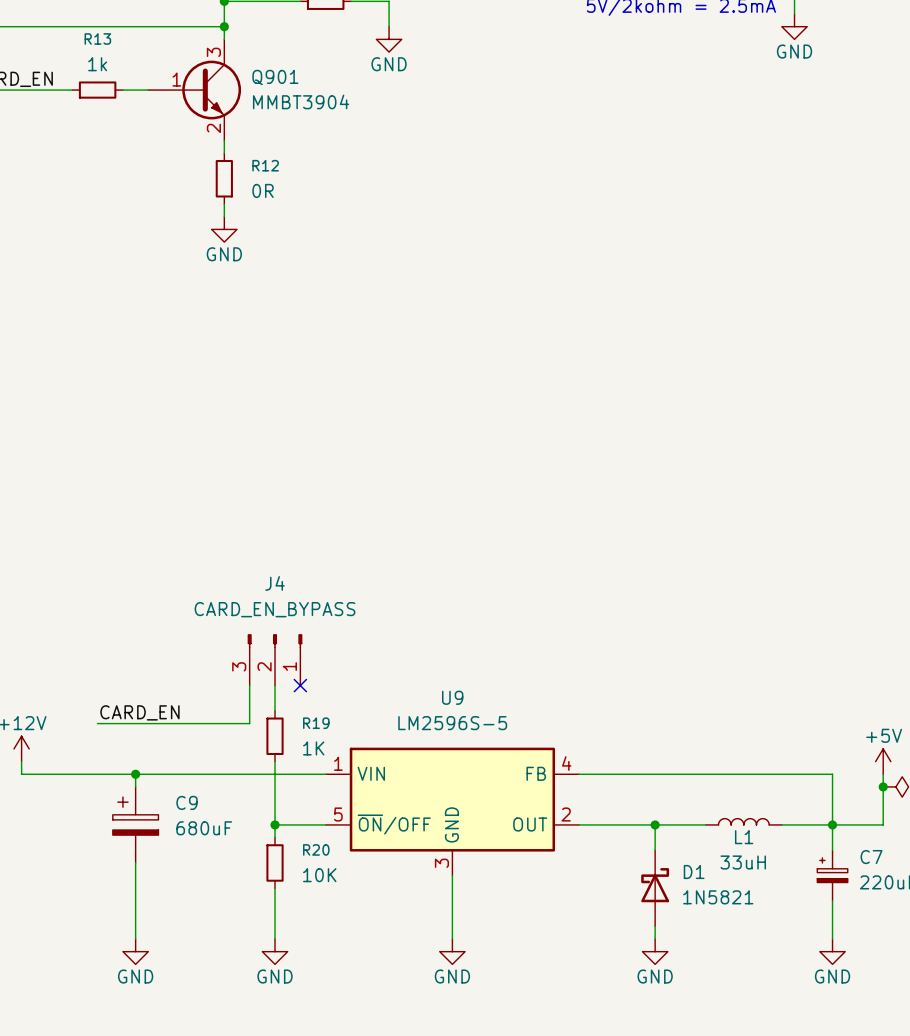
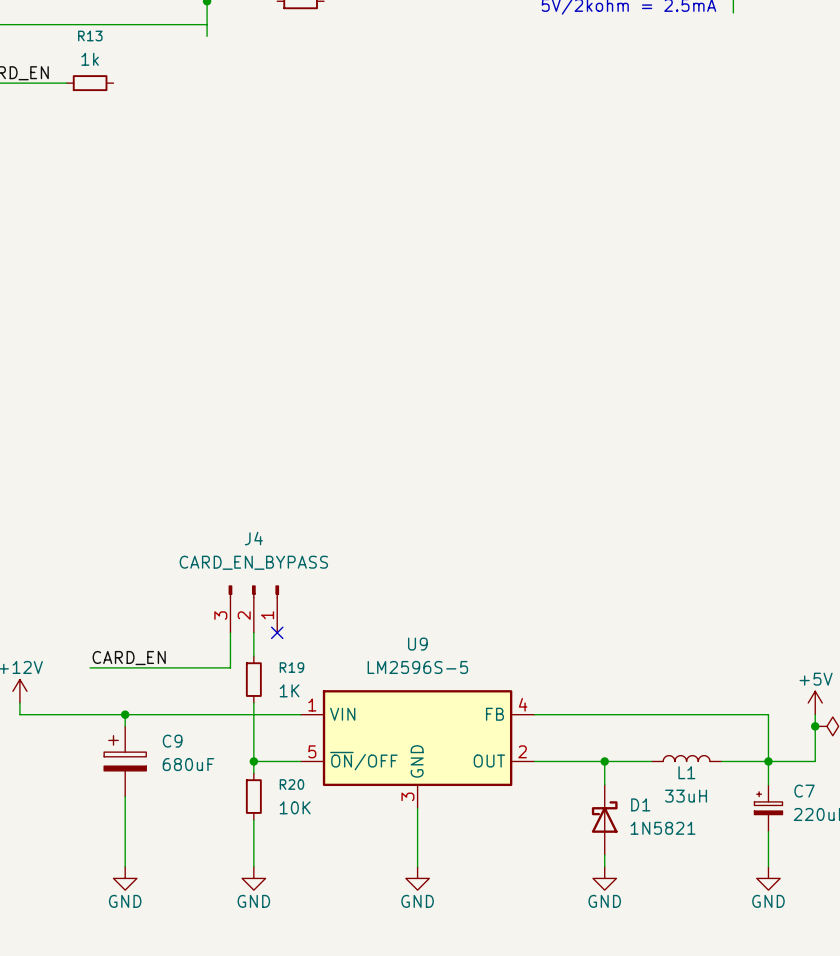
wire: (224, 1) (300, 1) -> none
wire: (351, 1) (389, 1) (389, 26) -> none
junction: (224, 26) -> none
power symbol: GND (794, 26) -> none
power symbol: GND (389, 39) -> none
wire: (122, 90) (148, 90) -> none
Q901: MMBT3904 (194, 90) -> none
wire: (224, 140) (224, 153) -> none
R12: 0R (224, 178) -> none
wire: (224, 204) (224, 216) -> none
power symbol: GND (224, 229) -> none

